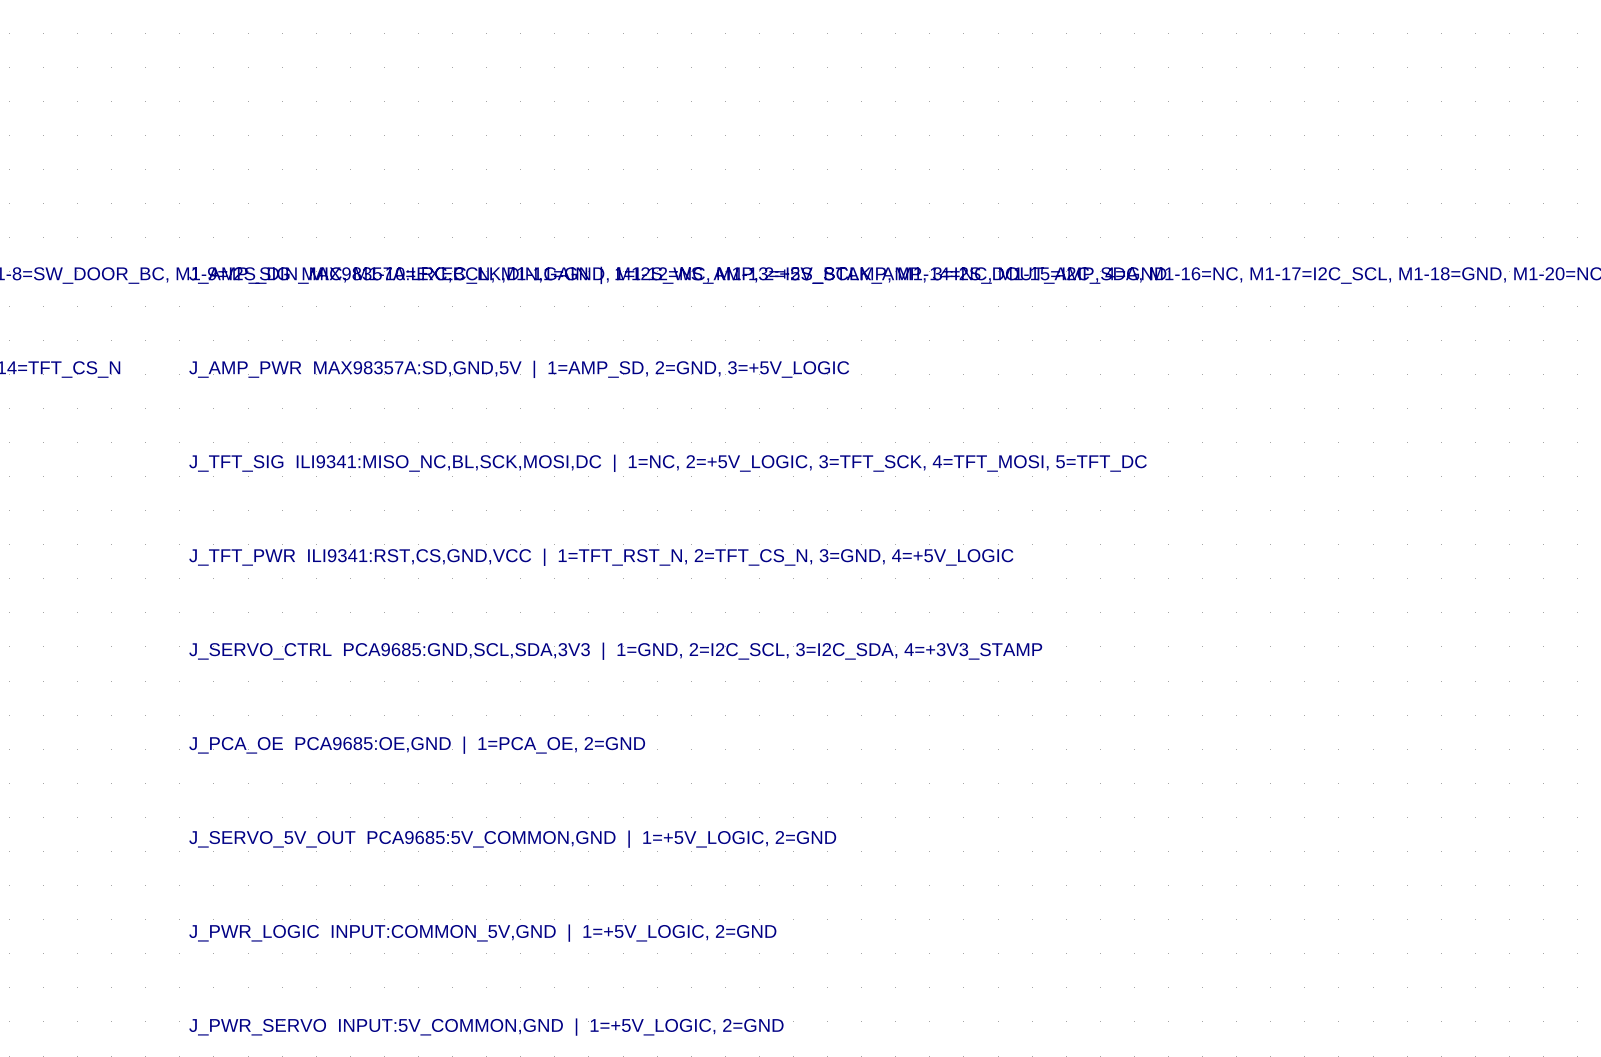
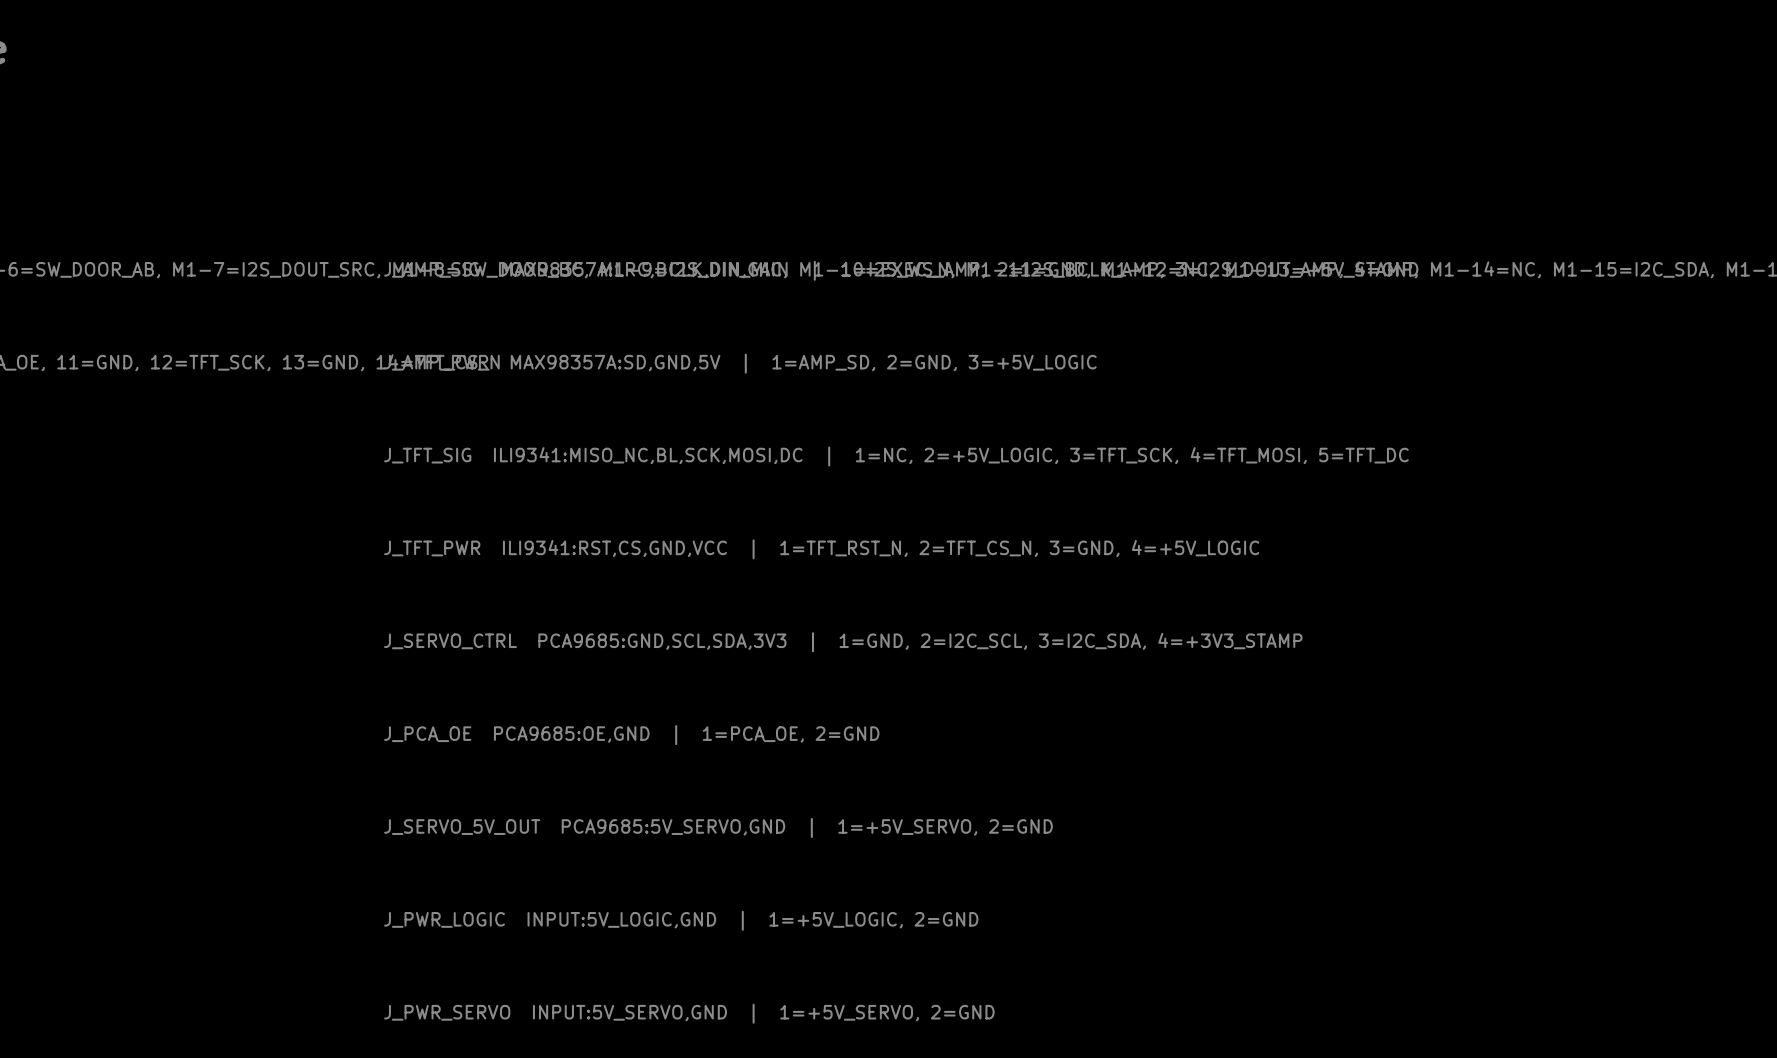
text: J_SERVO_5V_OUT PCA9685:5V_COMMON,GND | 1=+5V_LOGIC, 2=GND (512, 839) -> J_SERVO_5V_OUT PCA9685:5V_SERVO,GND | 1=+5V_SERVO, 2=GND (718, 827)
text: J_PWR_LOGIC INPUT:COMMON_5V,GND | 1=+5V_LOGIC, 2=GND (482, 933) -> J_PWR_LOGIC INPUT:5V_LOGIC,GND | 1=+5V_LOGIC, 2=GND (681, 920)
text: J_PWR_SERVO INPUT:5V_COMMON,GND | 1=+5V_LOGIC, 2=GND (486, 1027) -> J_PWR_SERVO INPUT:5V_SERVO,GND | 1=+5V_SERVO, 2=GND (689, 1013)

